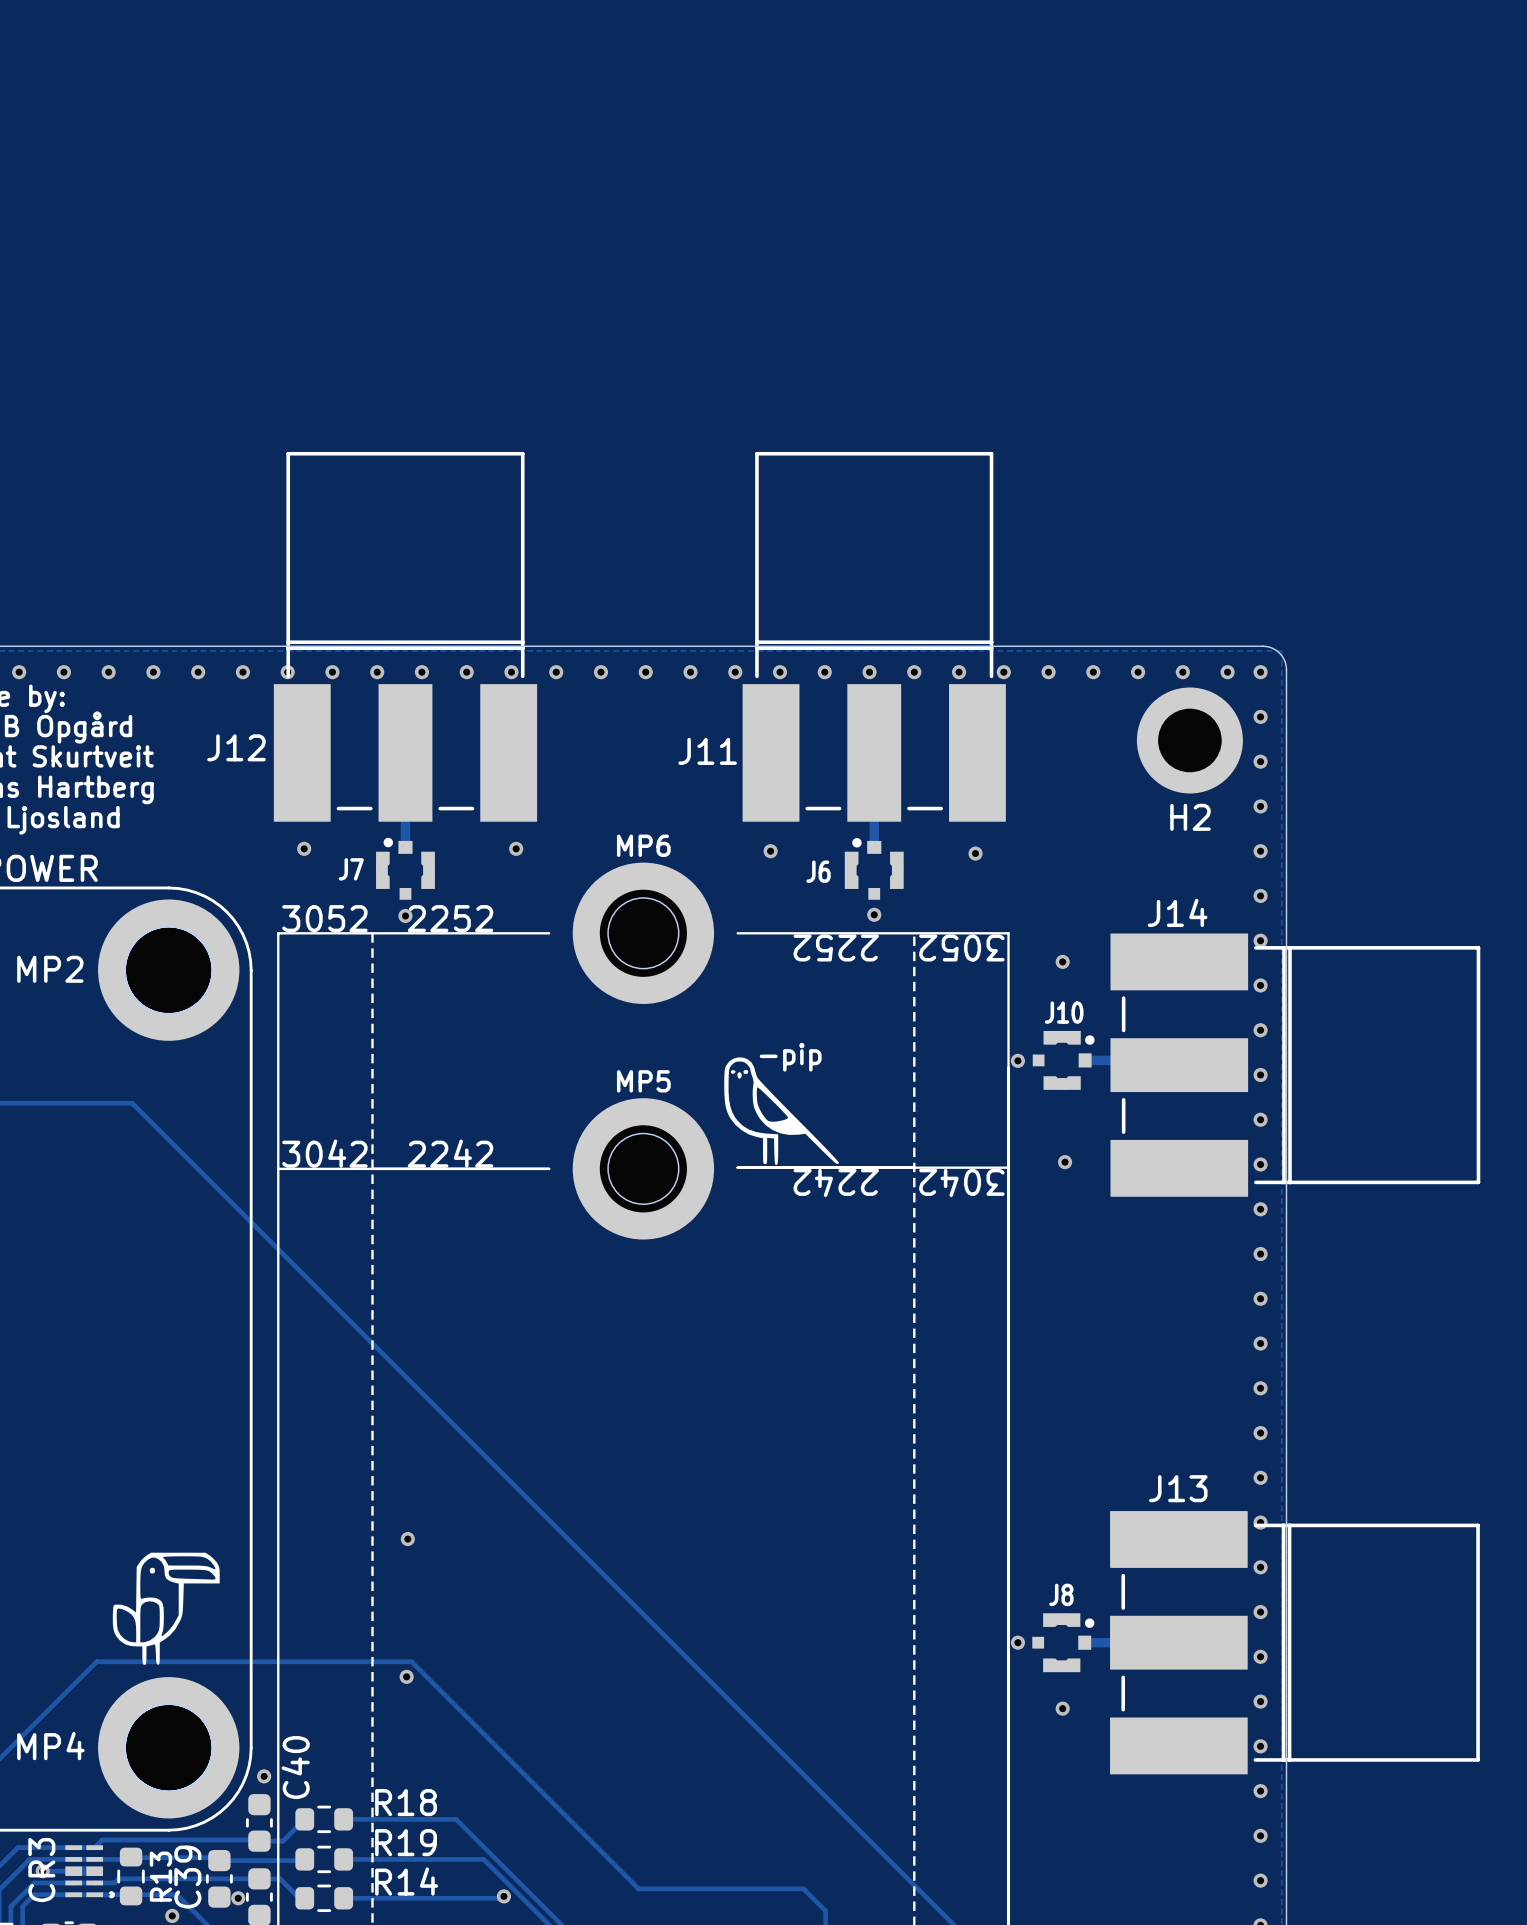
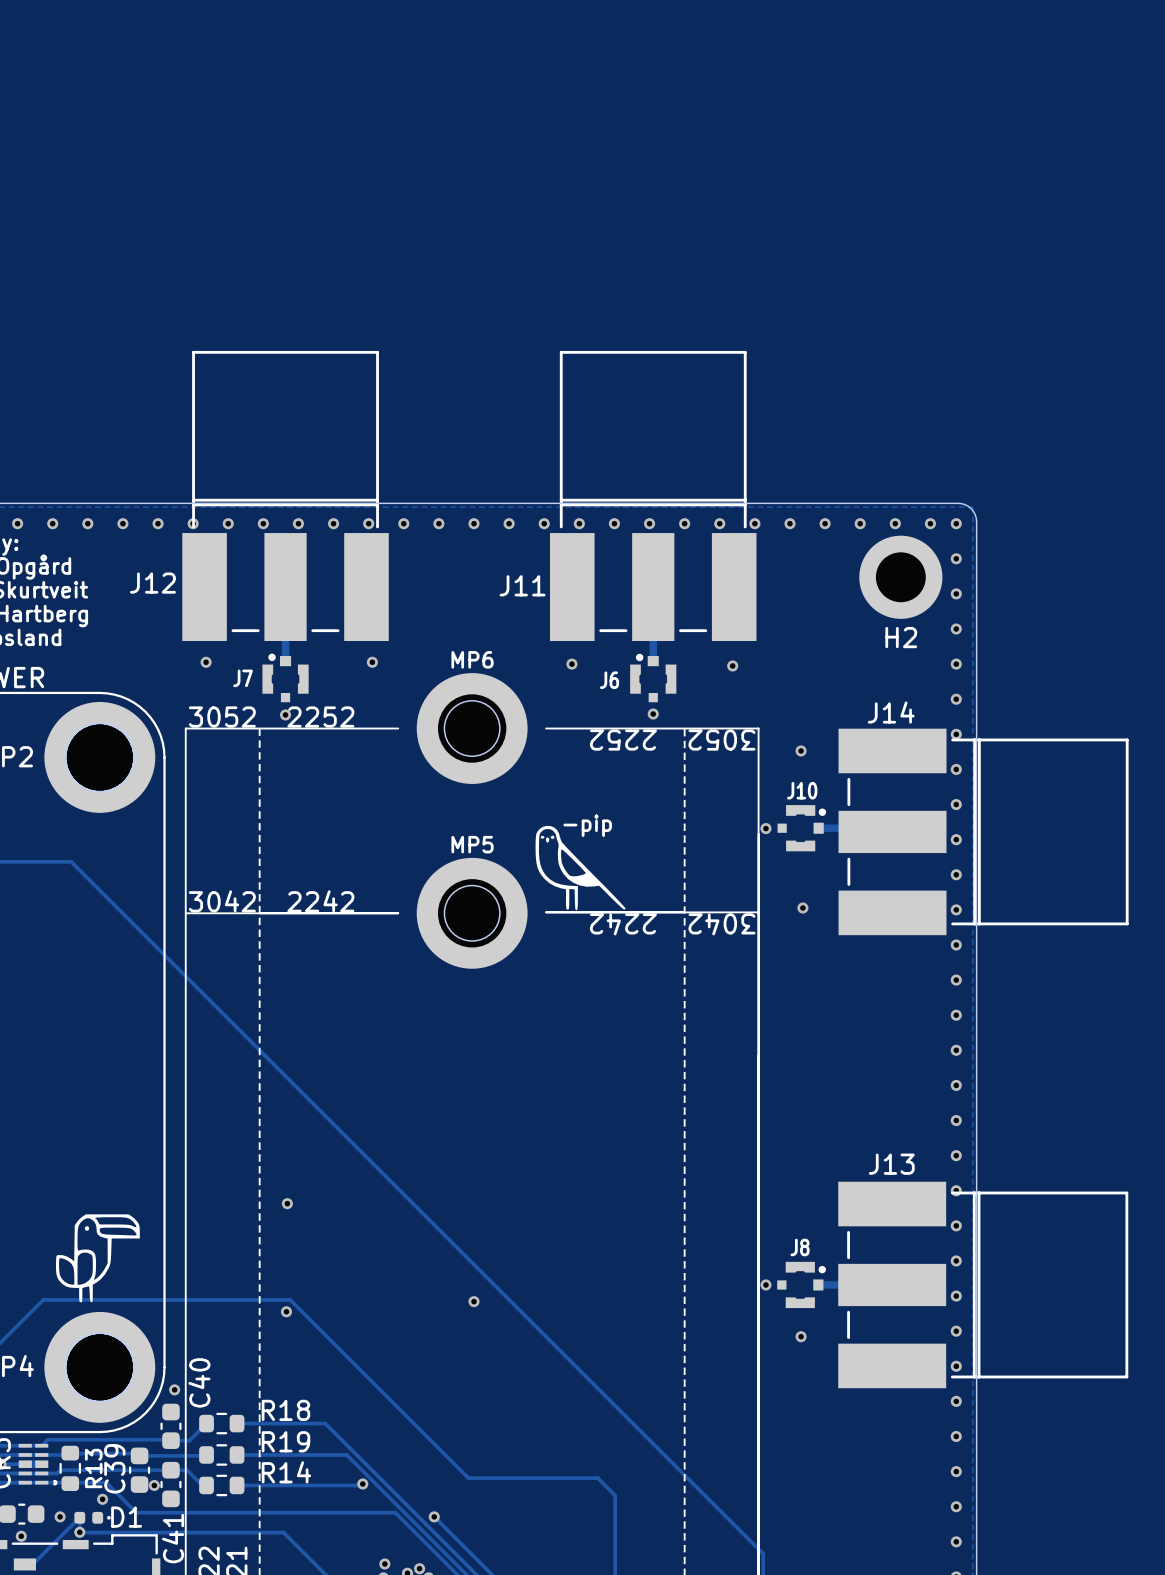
via: none -> (474, 1301)

